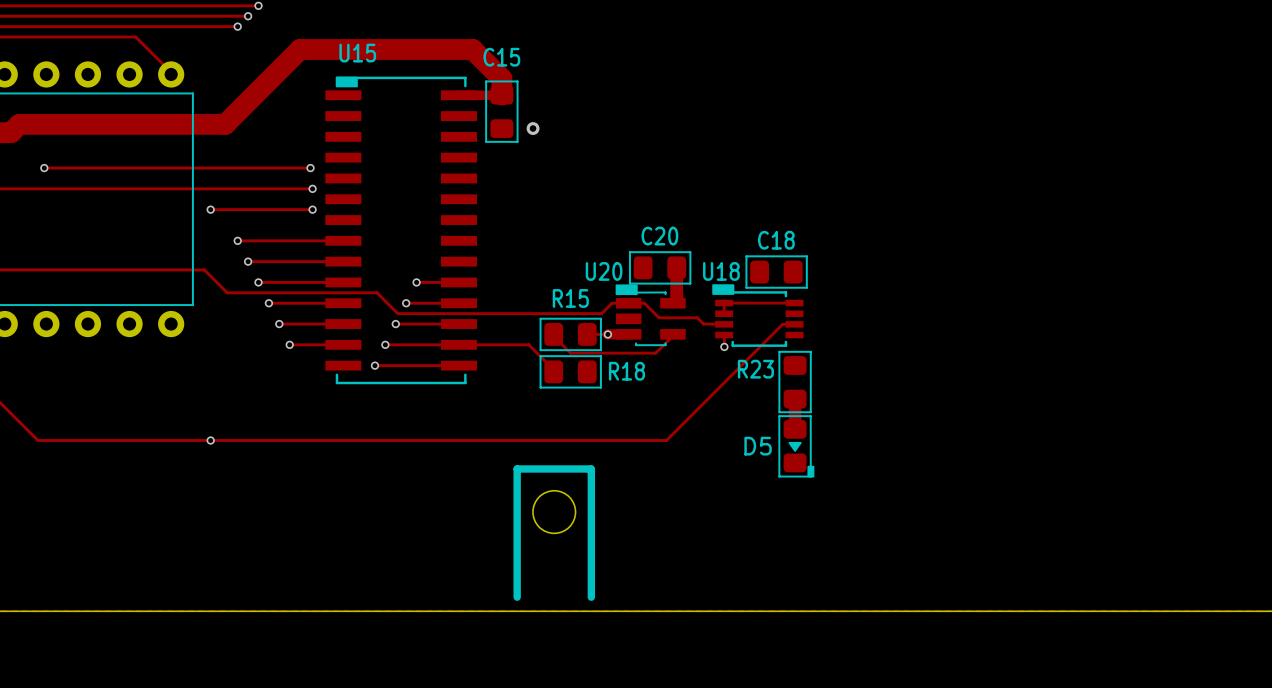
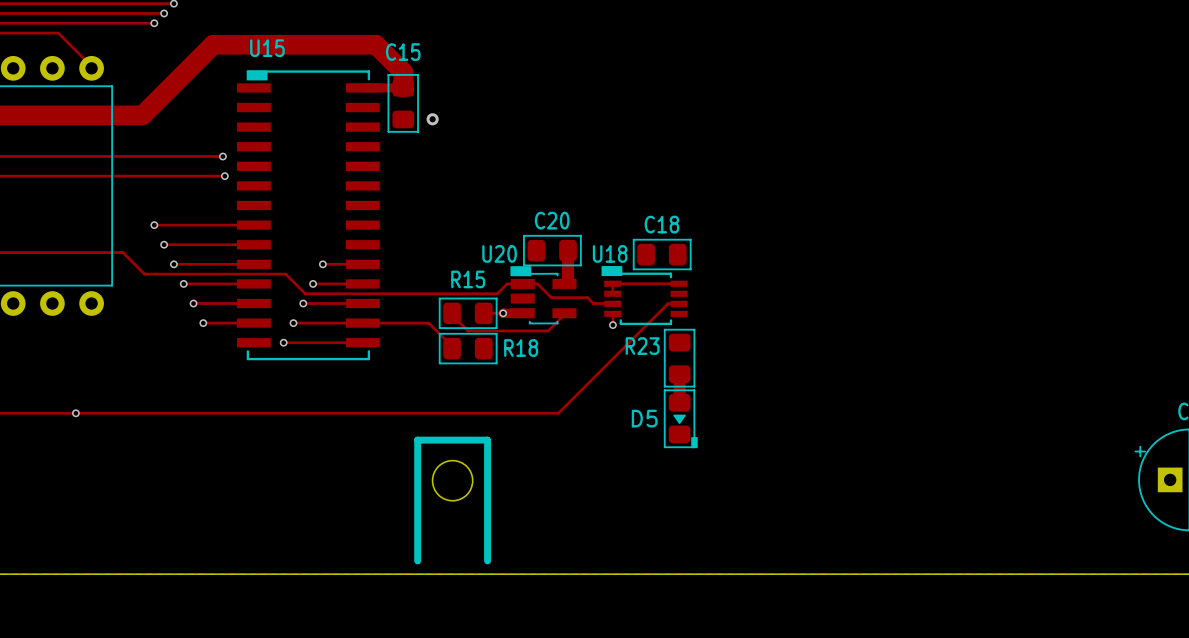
track: (210, 209) (312, 209) -> none
via: (210, 209) -> none
via: (312, 209) -> none
via position: (210, 440) -> (75, 413)

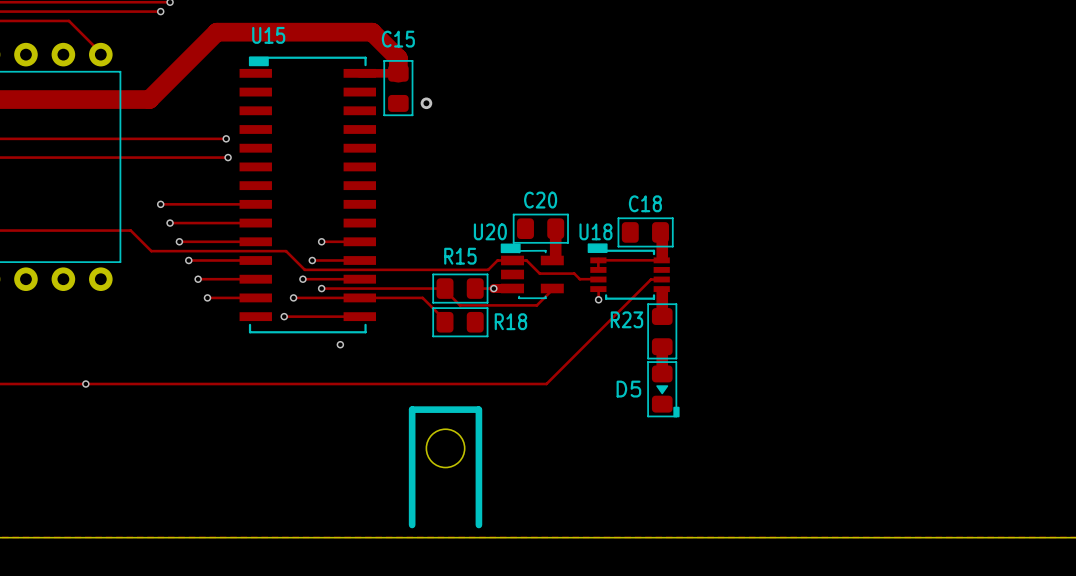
track: none -> (662, 230) (662, 256)
track: none -> (321, 288) (441, 288)
via: none -> (321, 288)
track: none -> (662, 292) (662, 316)
via: none -> (340, 344)

